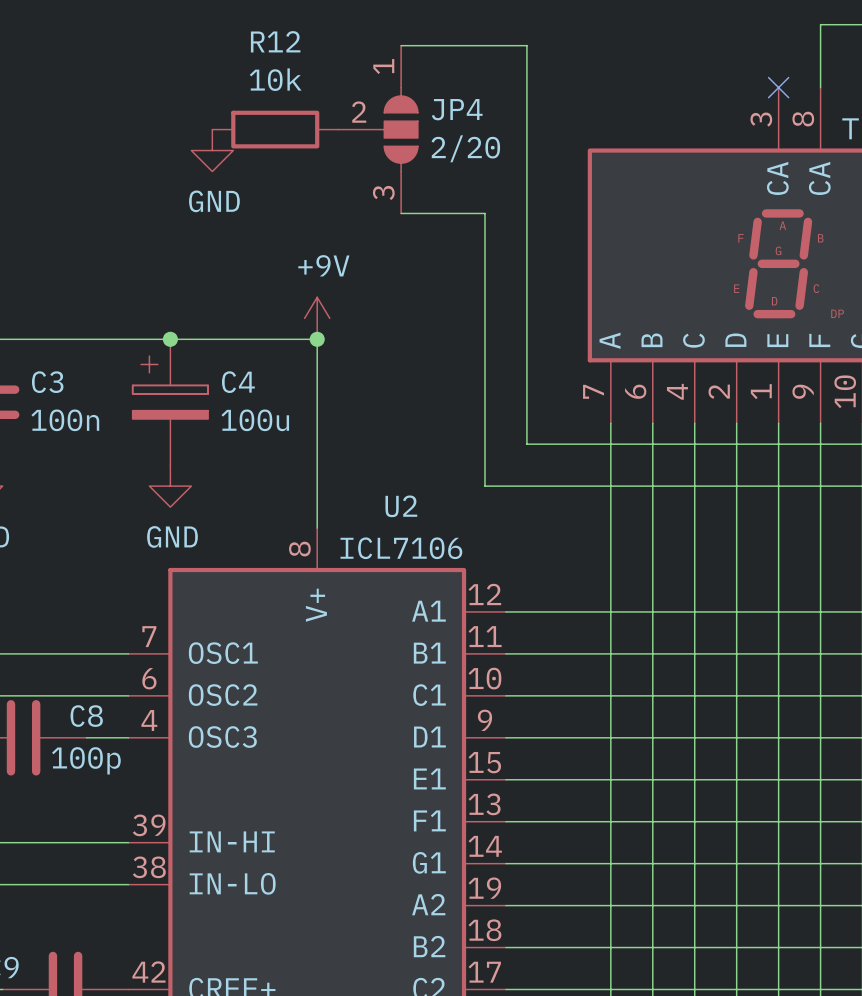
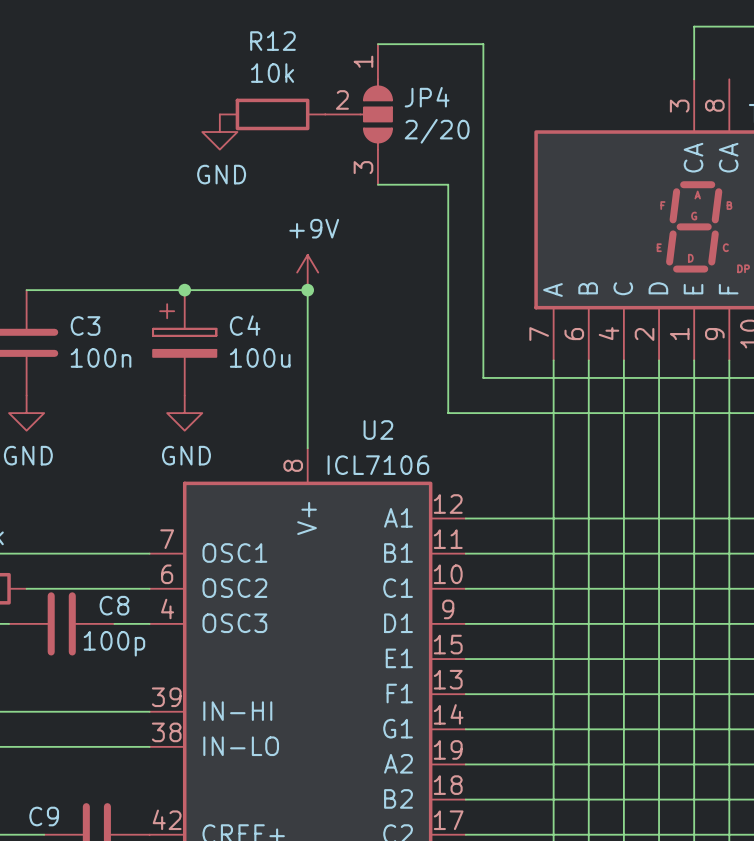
wire: (820, 24) (820, 87) -> (729, 26) (694, 26) (694, 79)
no-connect mark: (778, 87) -> none

